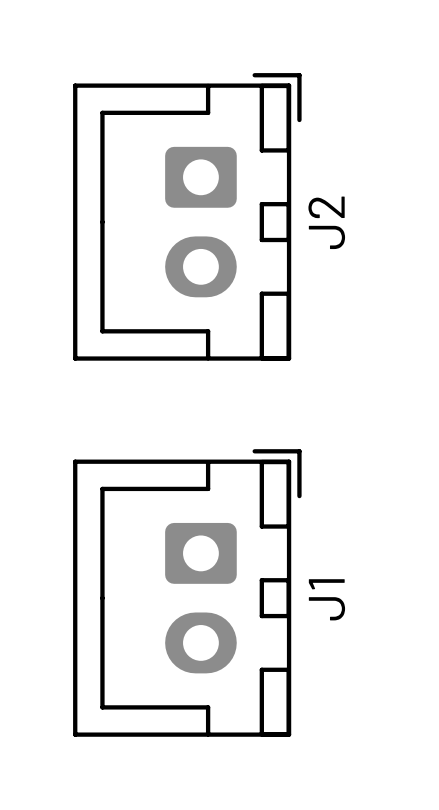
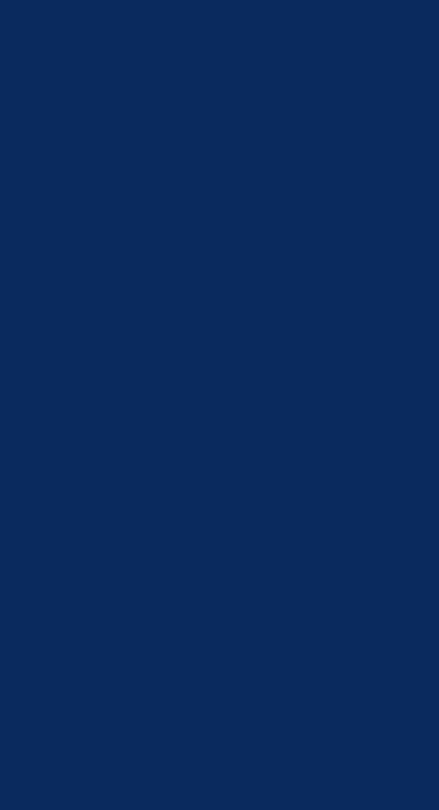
J2: (187, 216) -> none
J1: (187, 592) -> none

